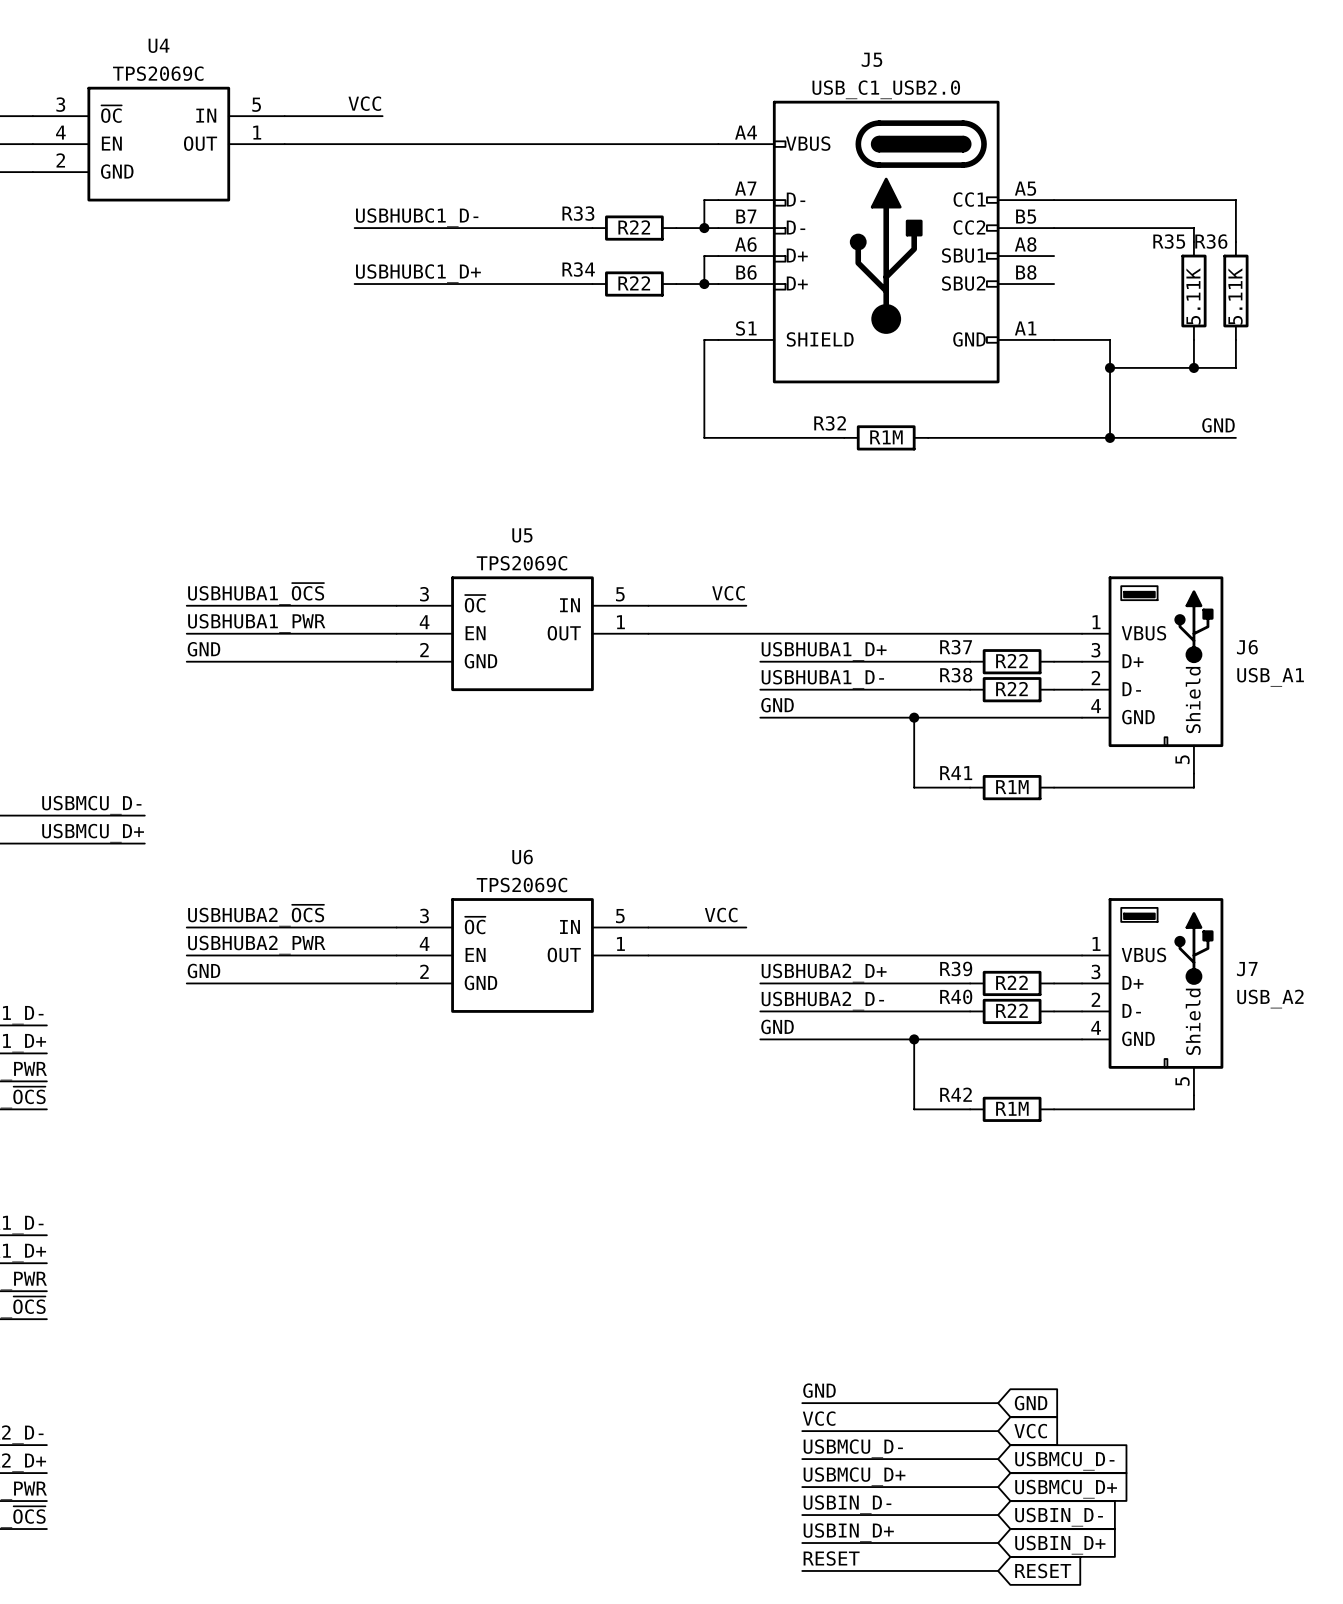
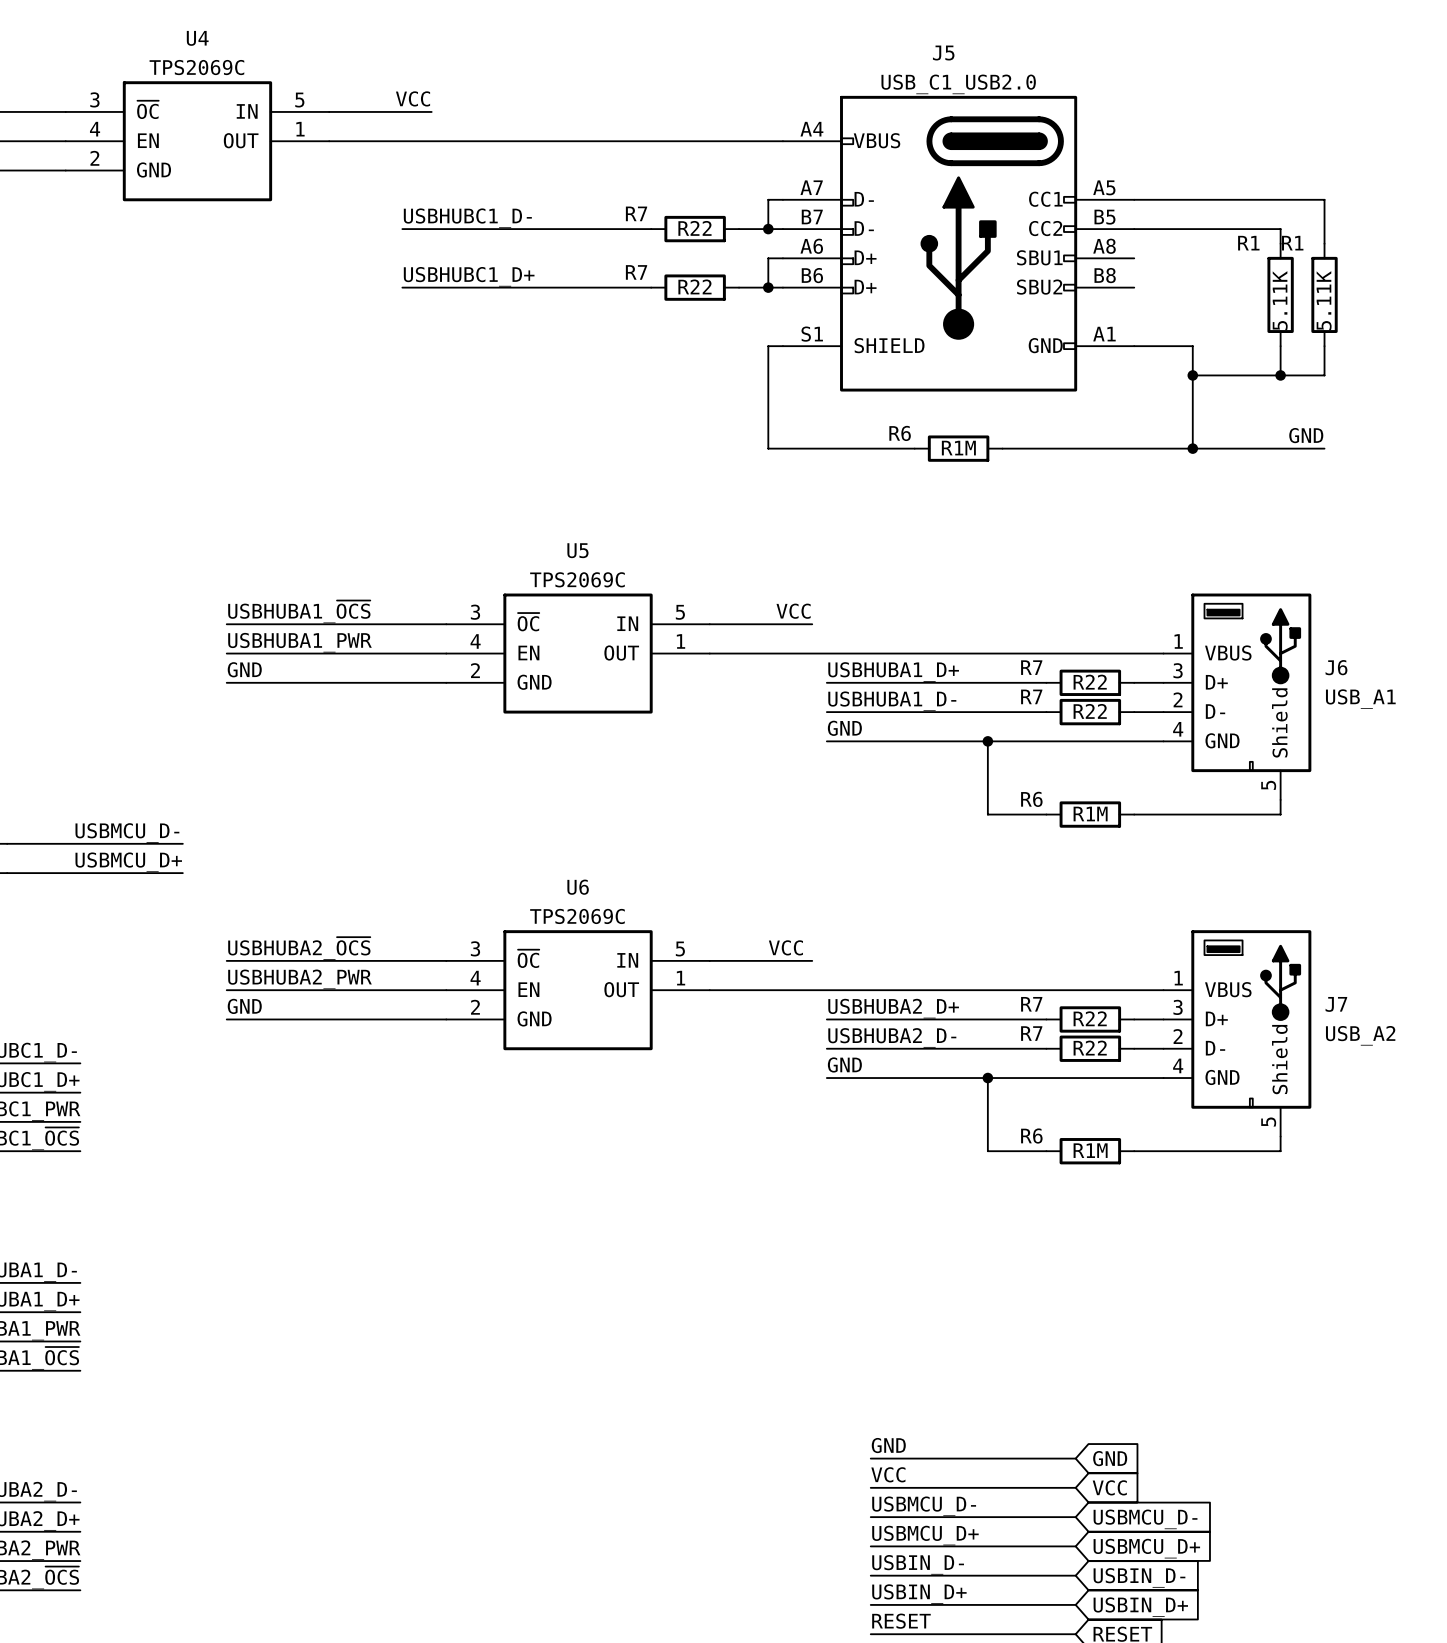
R33 name: R33 (578, 213) -> R7 (636, 213)
R35 name: R35 (1169, 241) -> R1 (1248, 243)
R36 name: R36 (1211, 241) -> R1 (1292, 243)
R34 name: R34 (578, 269) -> R7 (636, 272)
R32 name: R32 (830, 423) -> R6 (900, 433)
R37 name: R37 (956, 647) -> R7 (1031, 667)
R38 name: R38 (956, 675) -> R7 (1031, 696)
R41 name: R41 (956, 773) -> R6 (1031, 799)
R39 name: R39 (956, 968) -> R7 (1031, 1004)
R40 name: R40 (956, 996) -> R7 (1031, 1033)
R42 name: R42 (956, 1094) -> R6 (1031, 1136)

